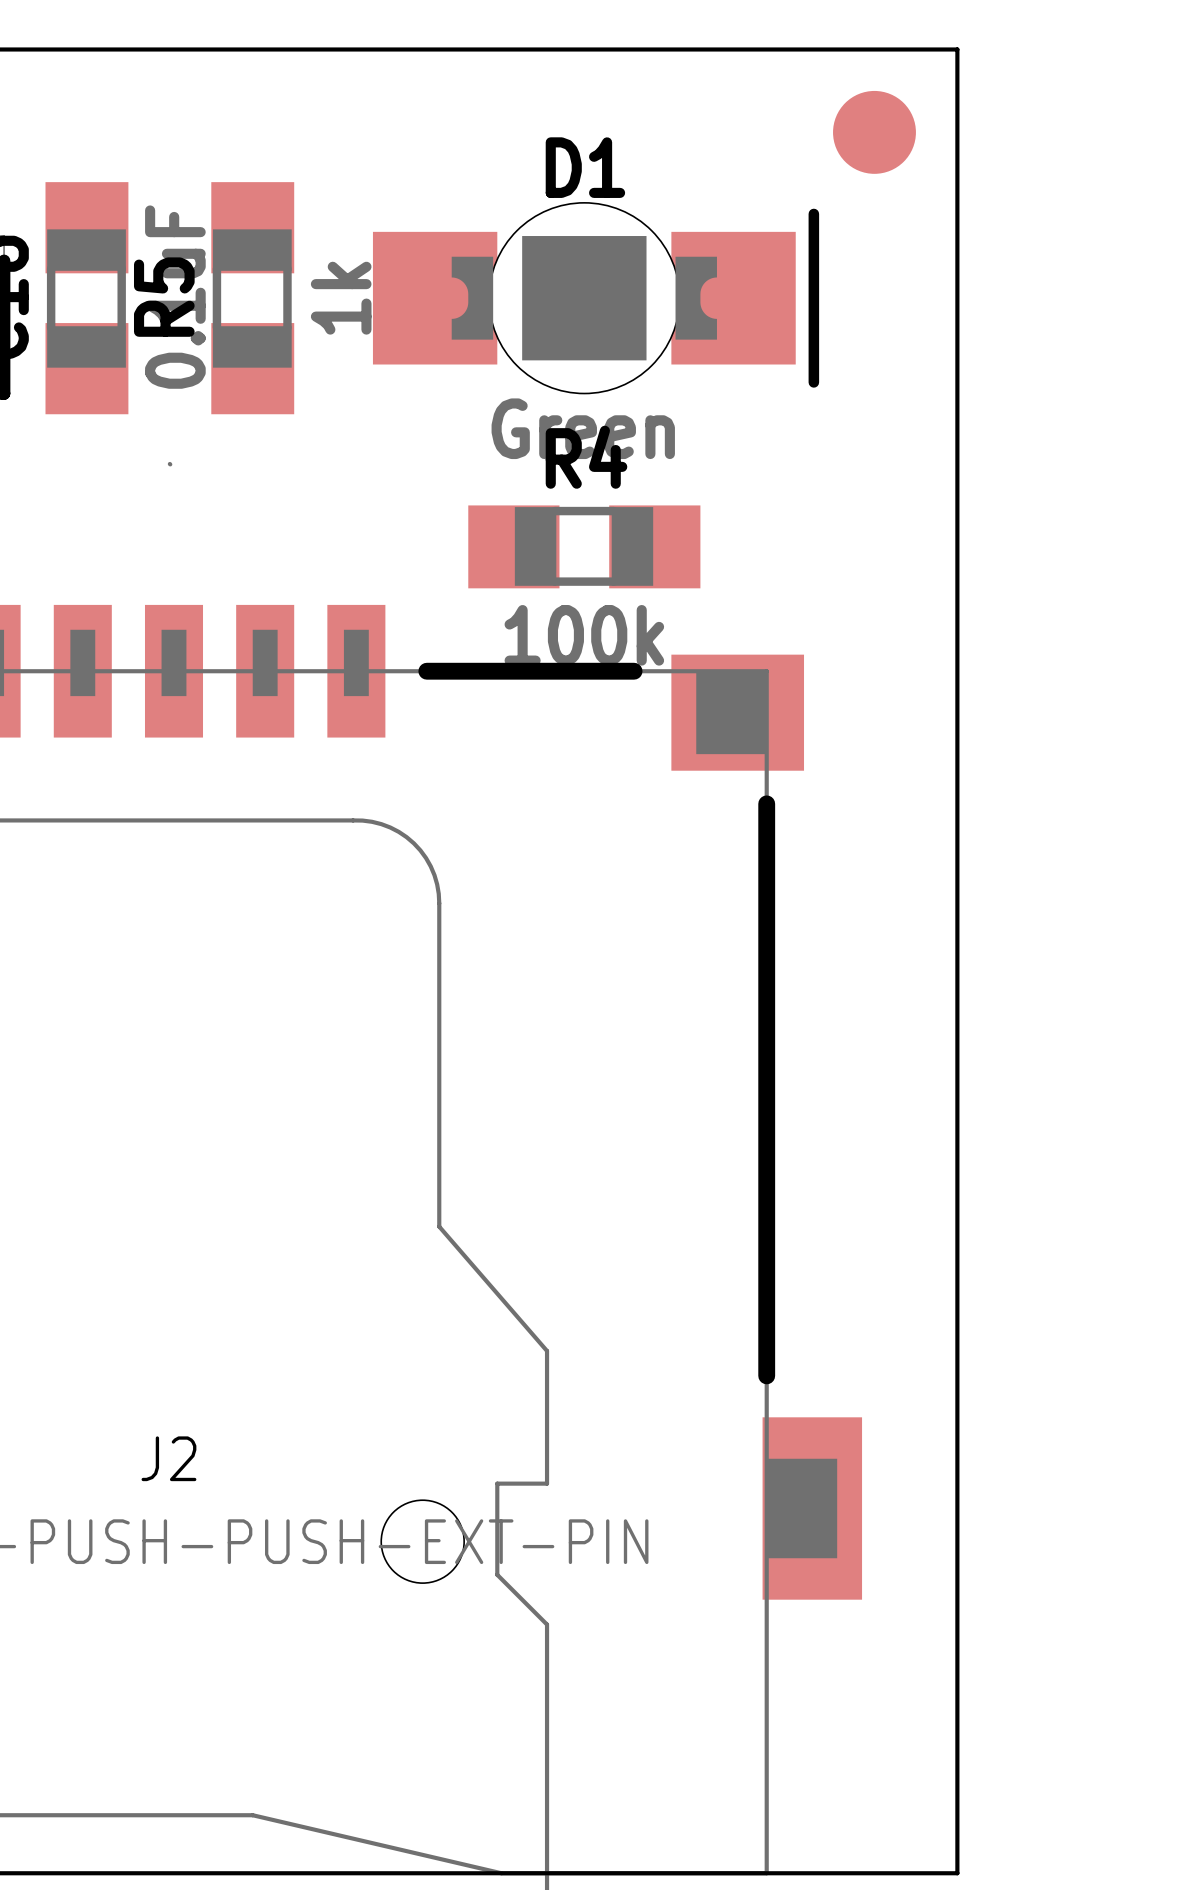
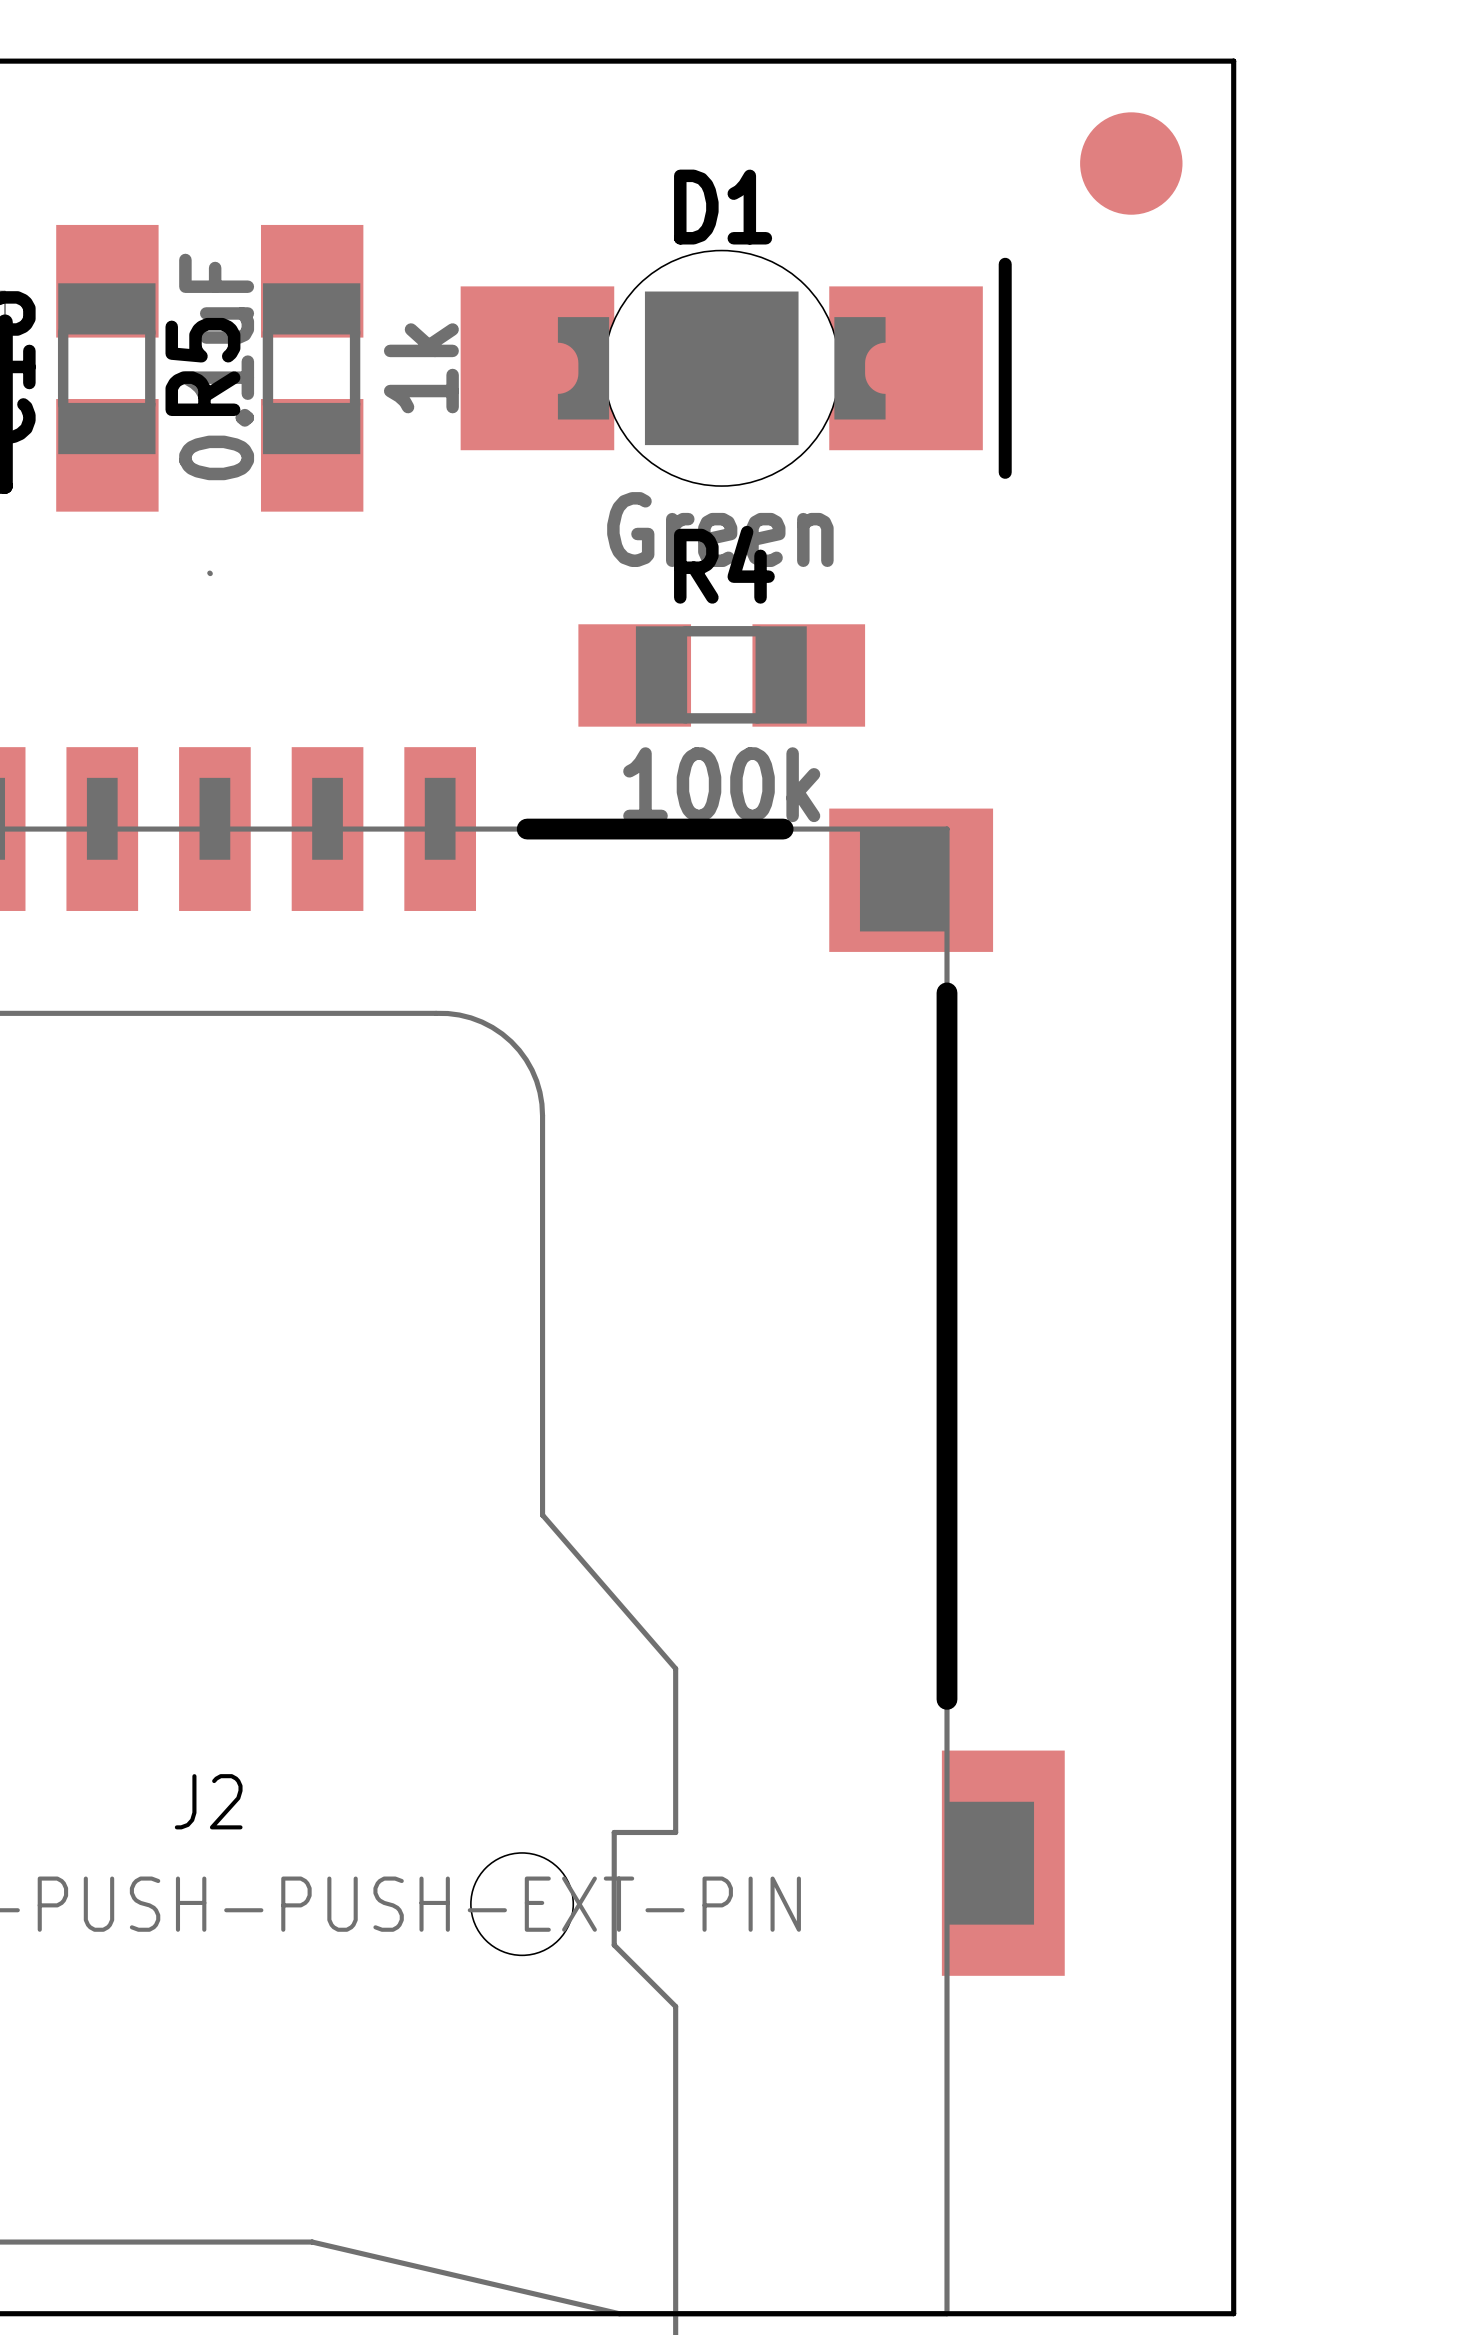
board edge: (957, 49) (957, 1873) -> (1182, 61) (1233, 61) (1233, 2313) (1182, 2313)
part position: (874, 132) -> (1131, 163)

